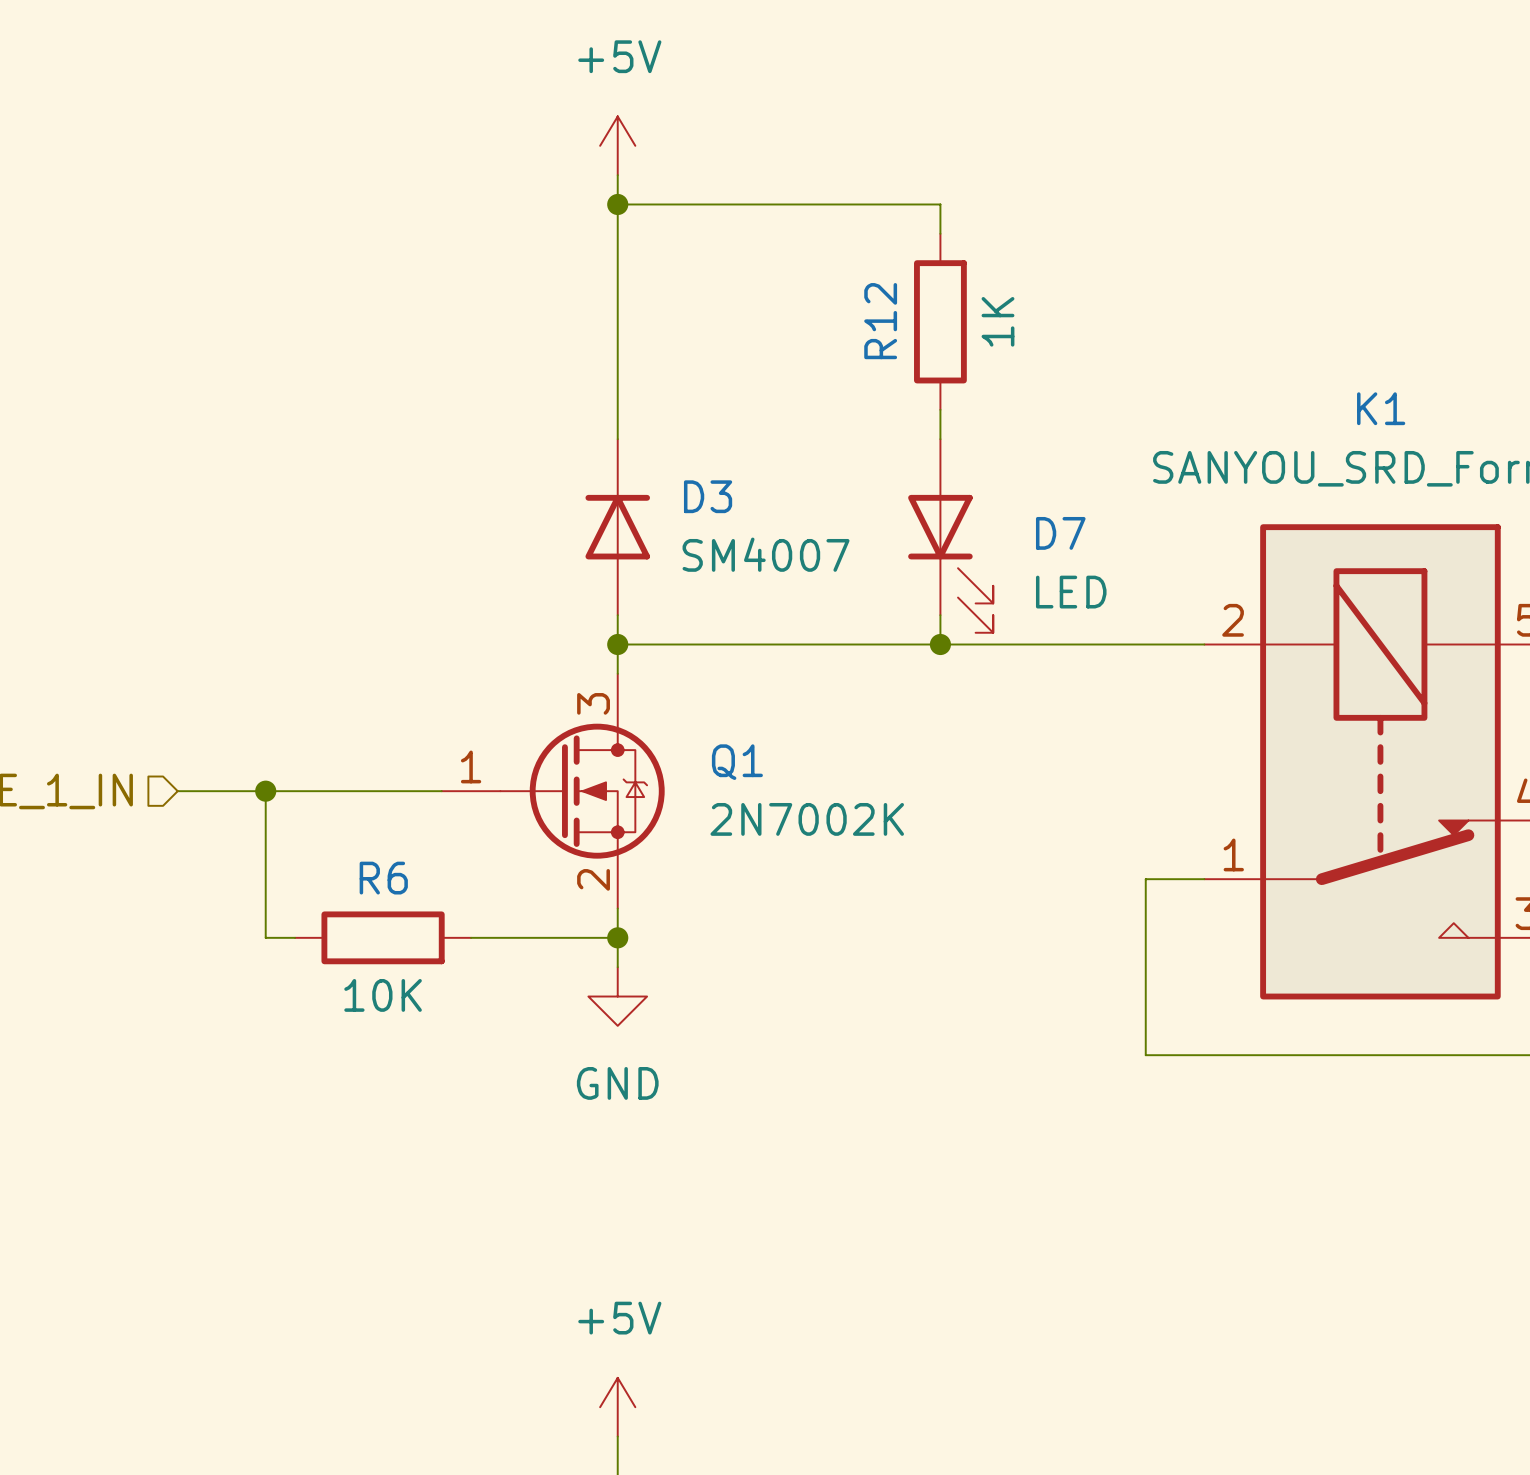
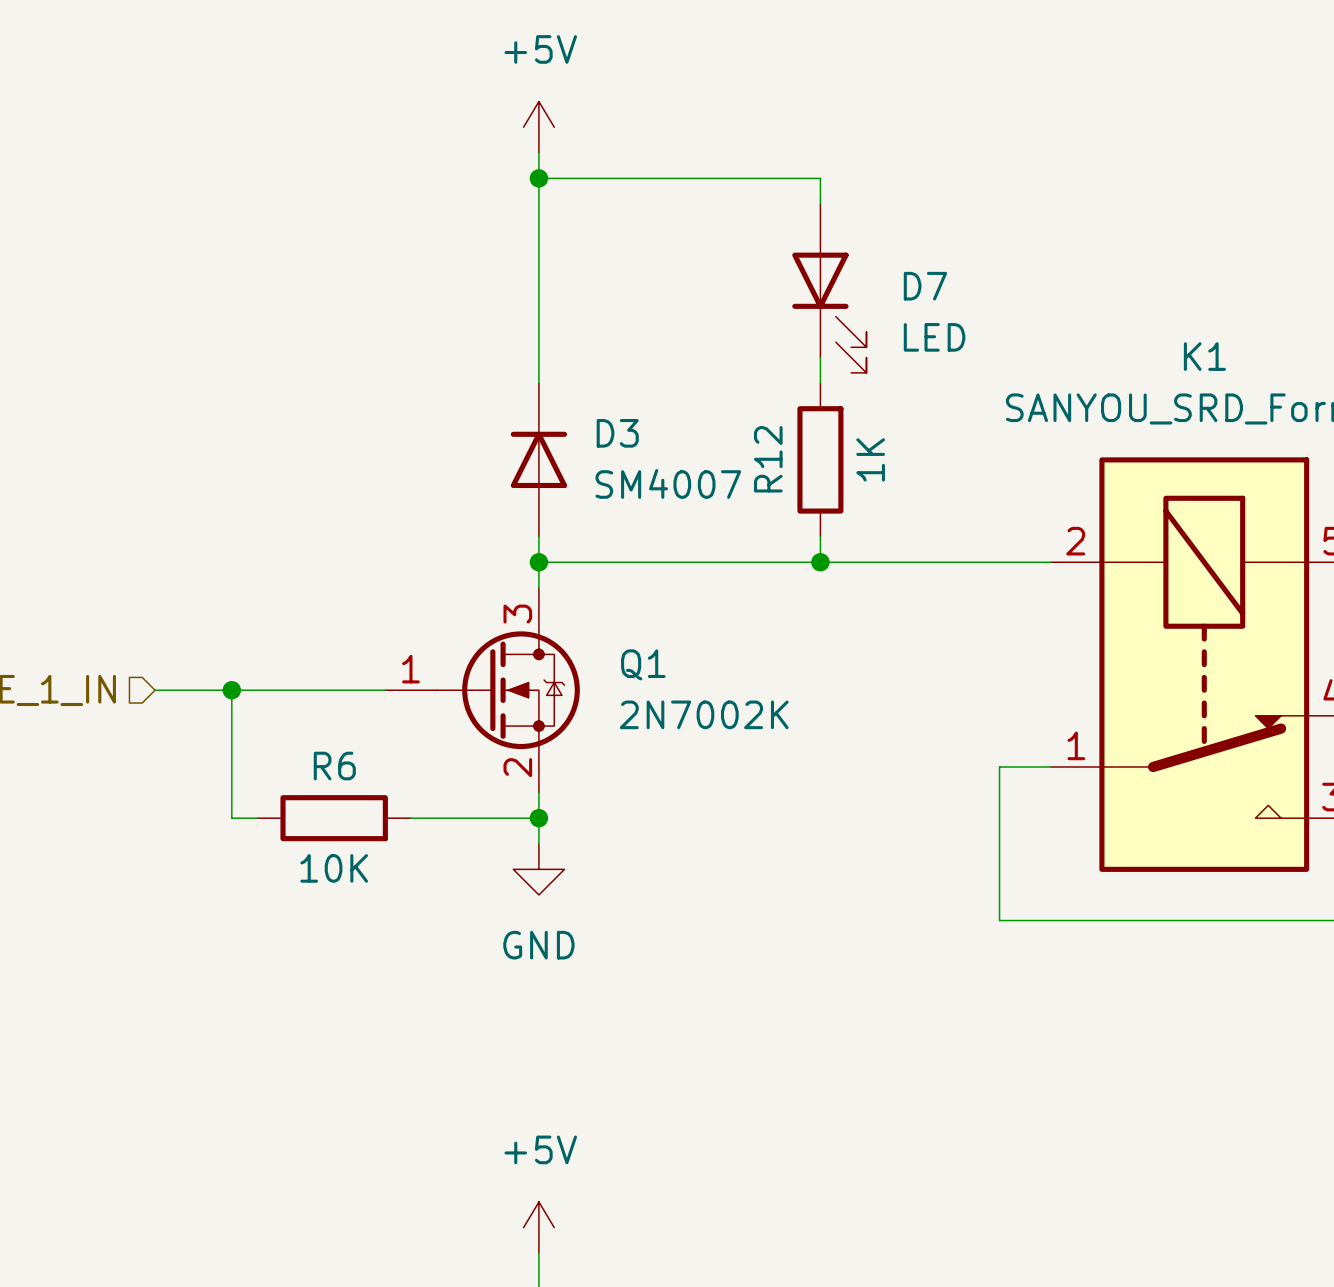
R12 position: (940, 321) -> (820, 459)
D7 position: (950, 535) -> (829, 288)

